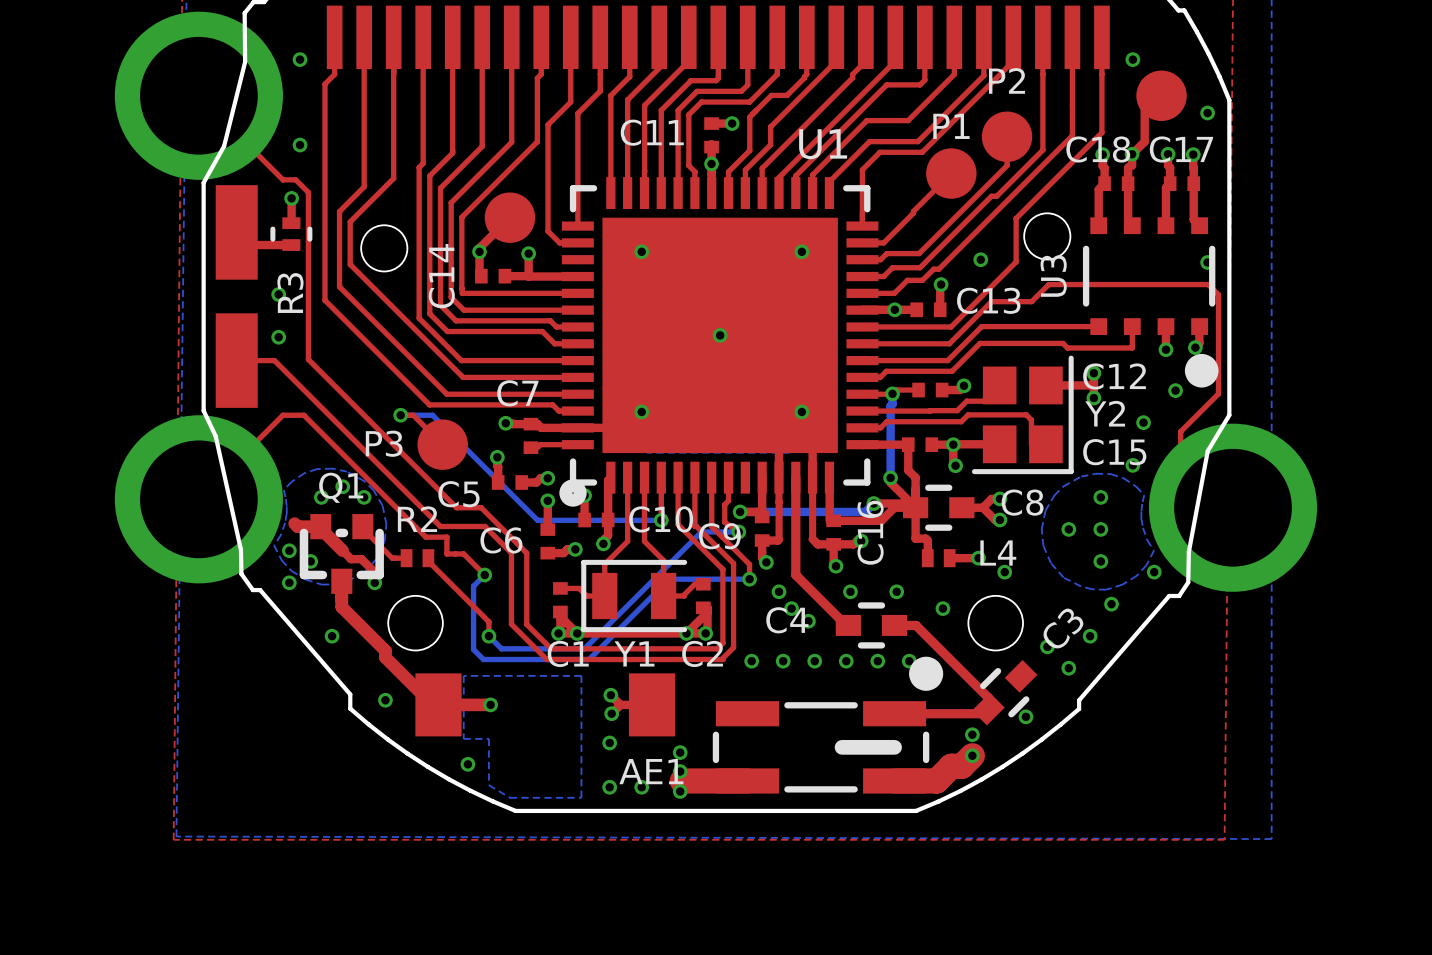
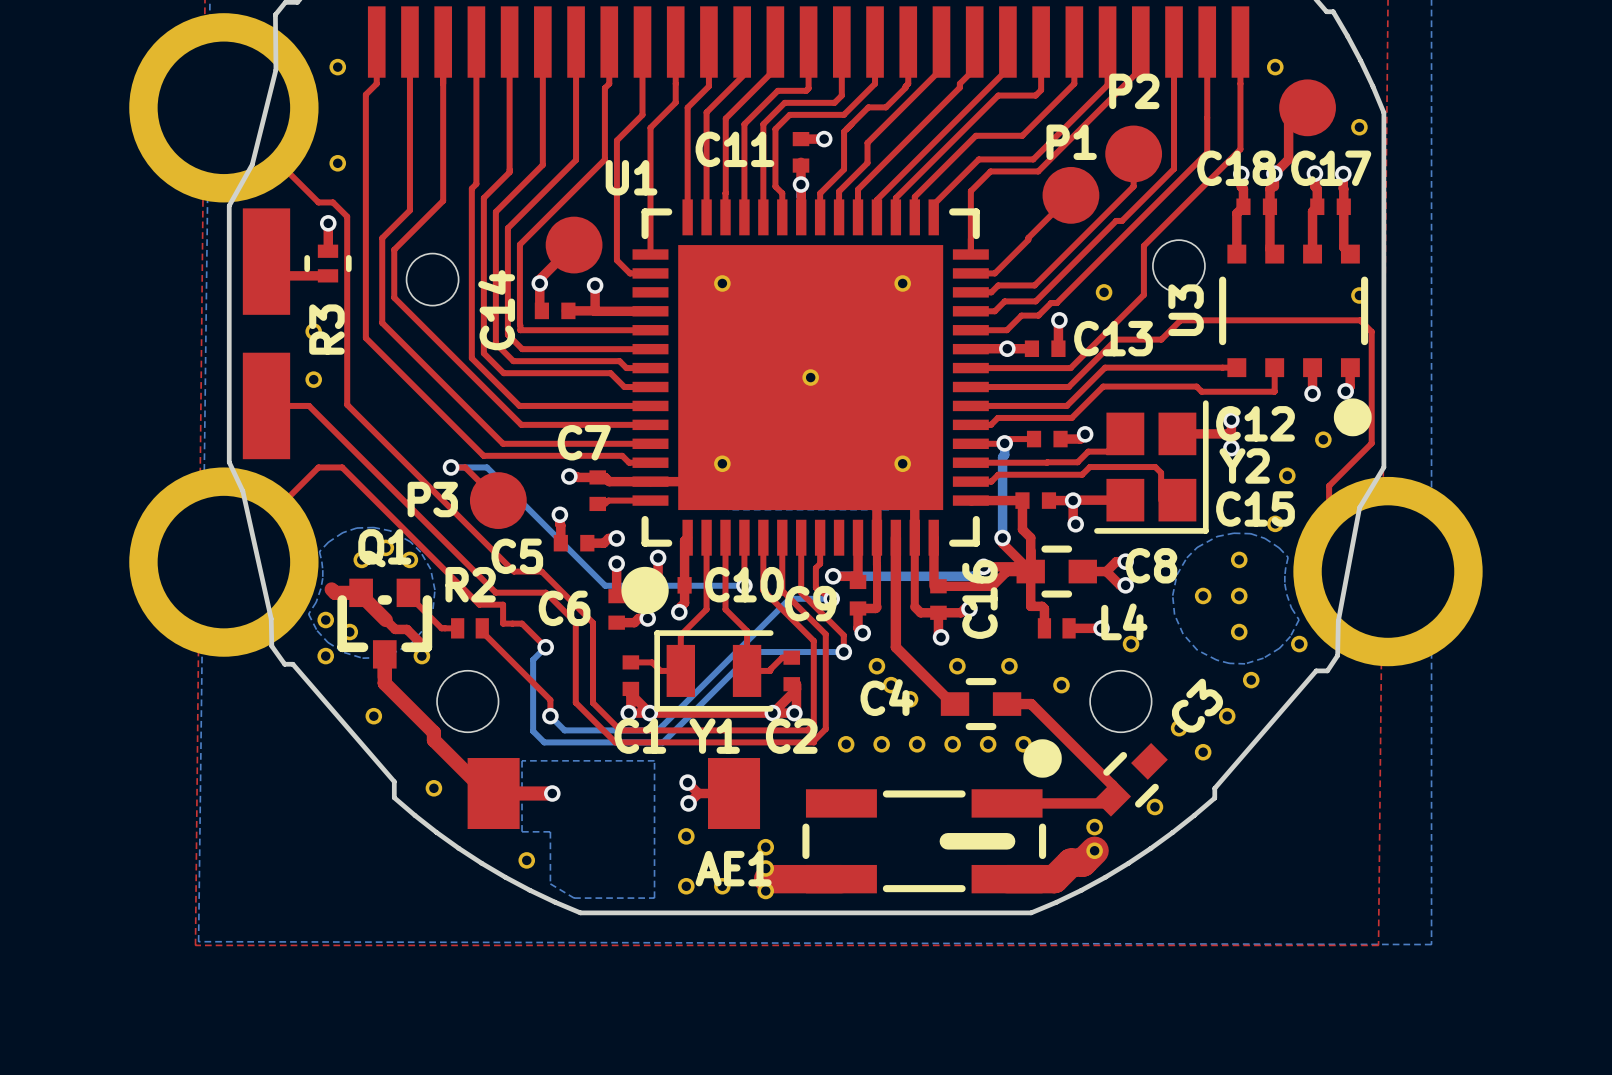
U1 name position: U1 (823, 144) -> U1 (631, 177)
U1 footprint: [559, 177, 879, 507] -> [621, 199, 989, 615]

